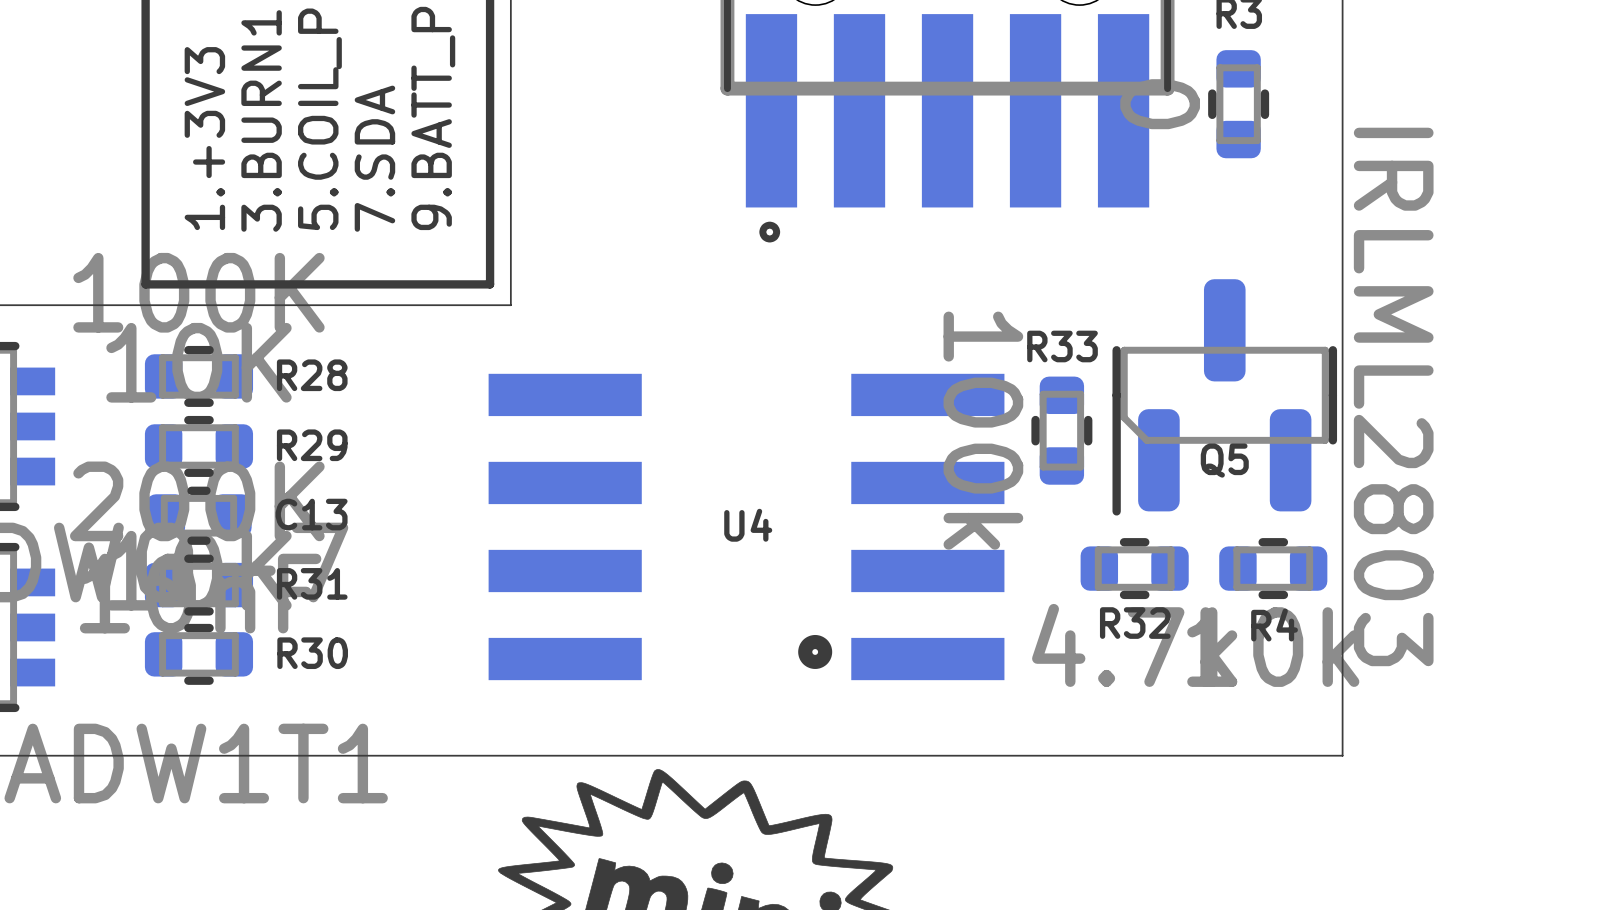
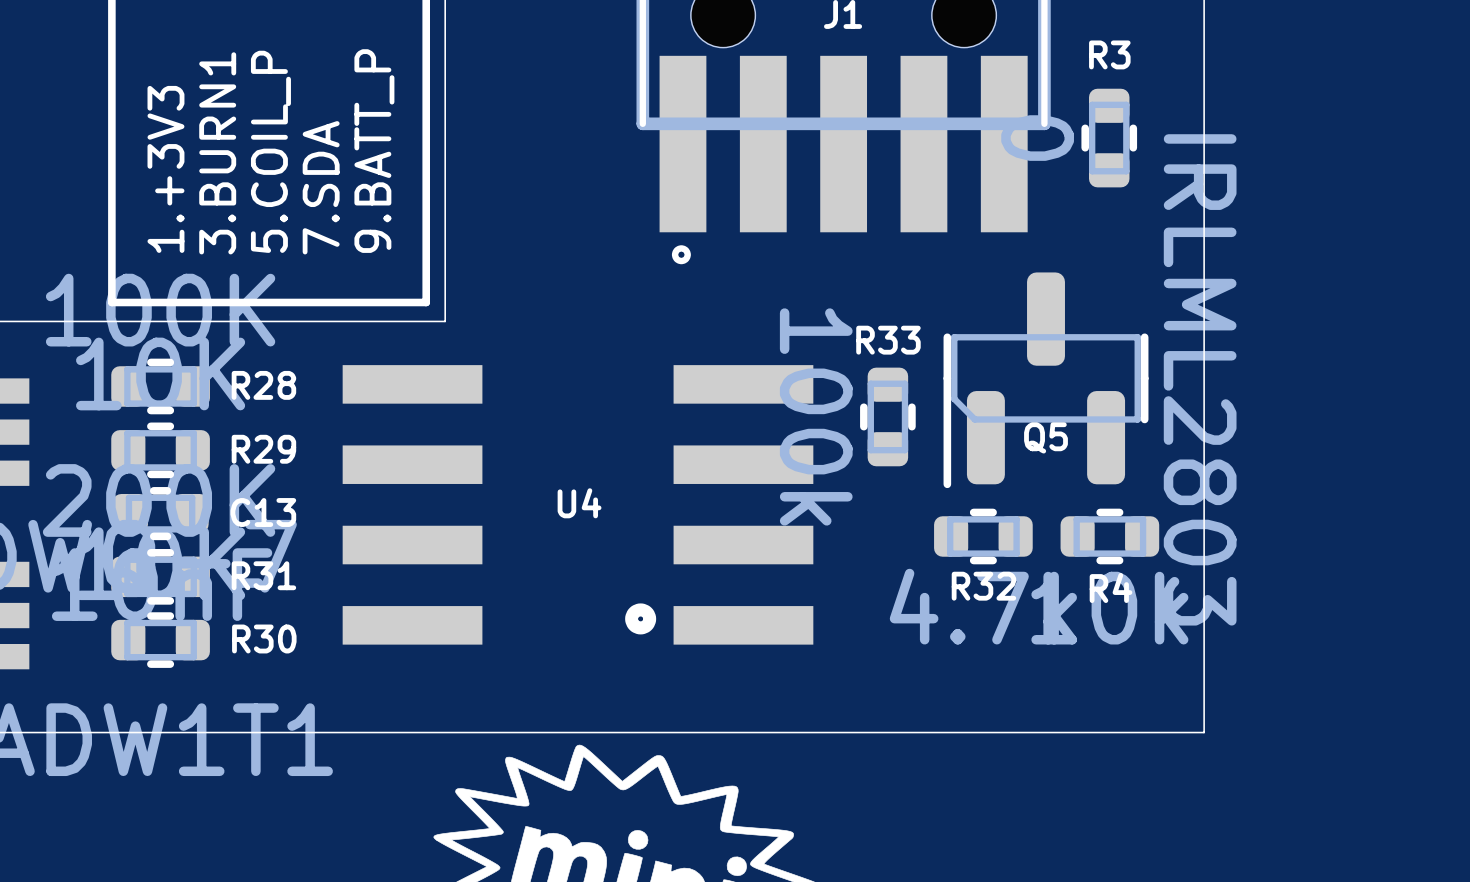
Q5 position: (1224, 397) -> (1046, 380)
R33 position: (1061, 430) -> (887, 416)
U4 position: (746, 526) -> (577, 504)
R32 position: (1134, 568) -> (983, 536)
R4 position: (1273, 568) -> (1109, 536)

